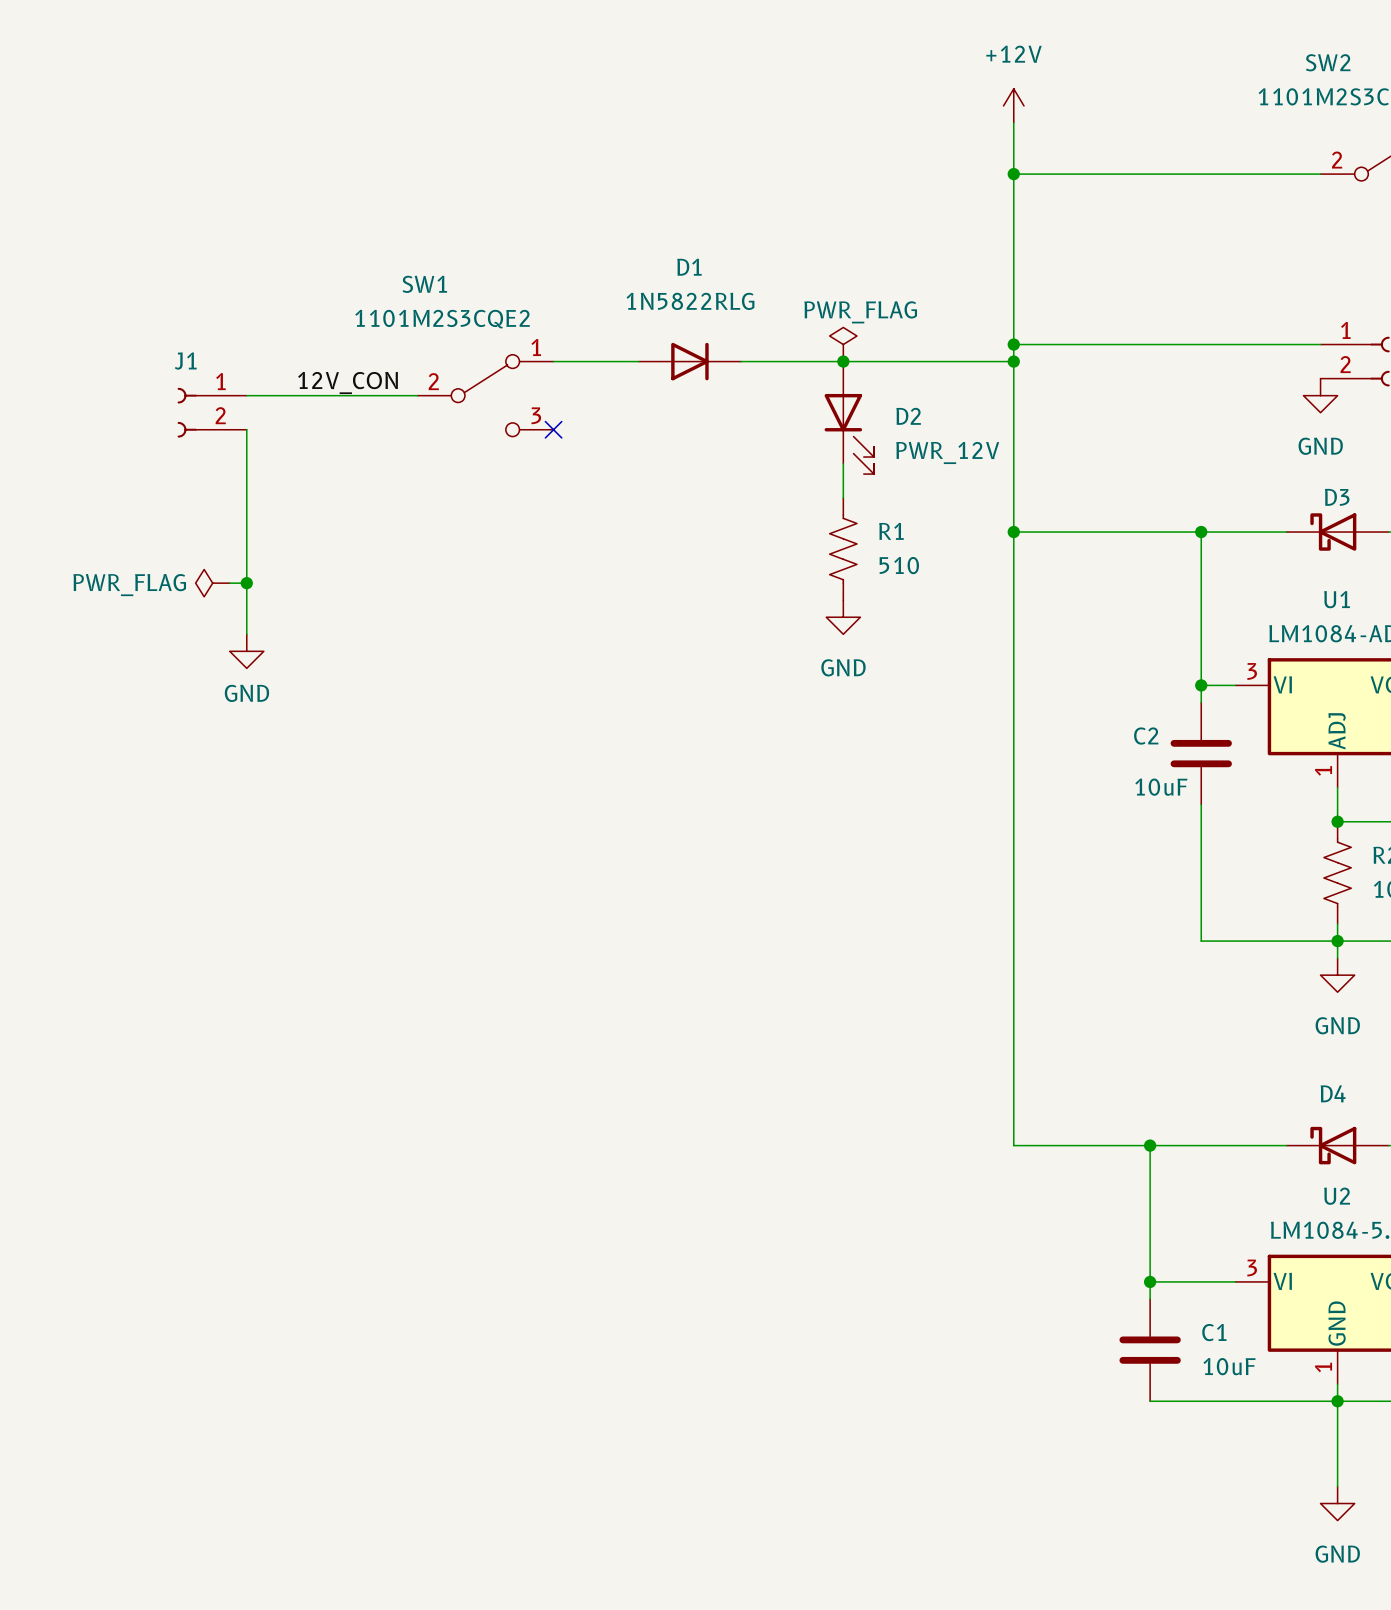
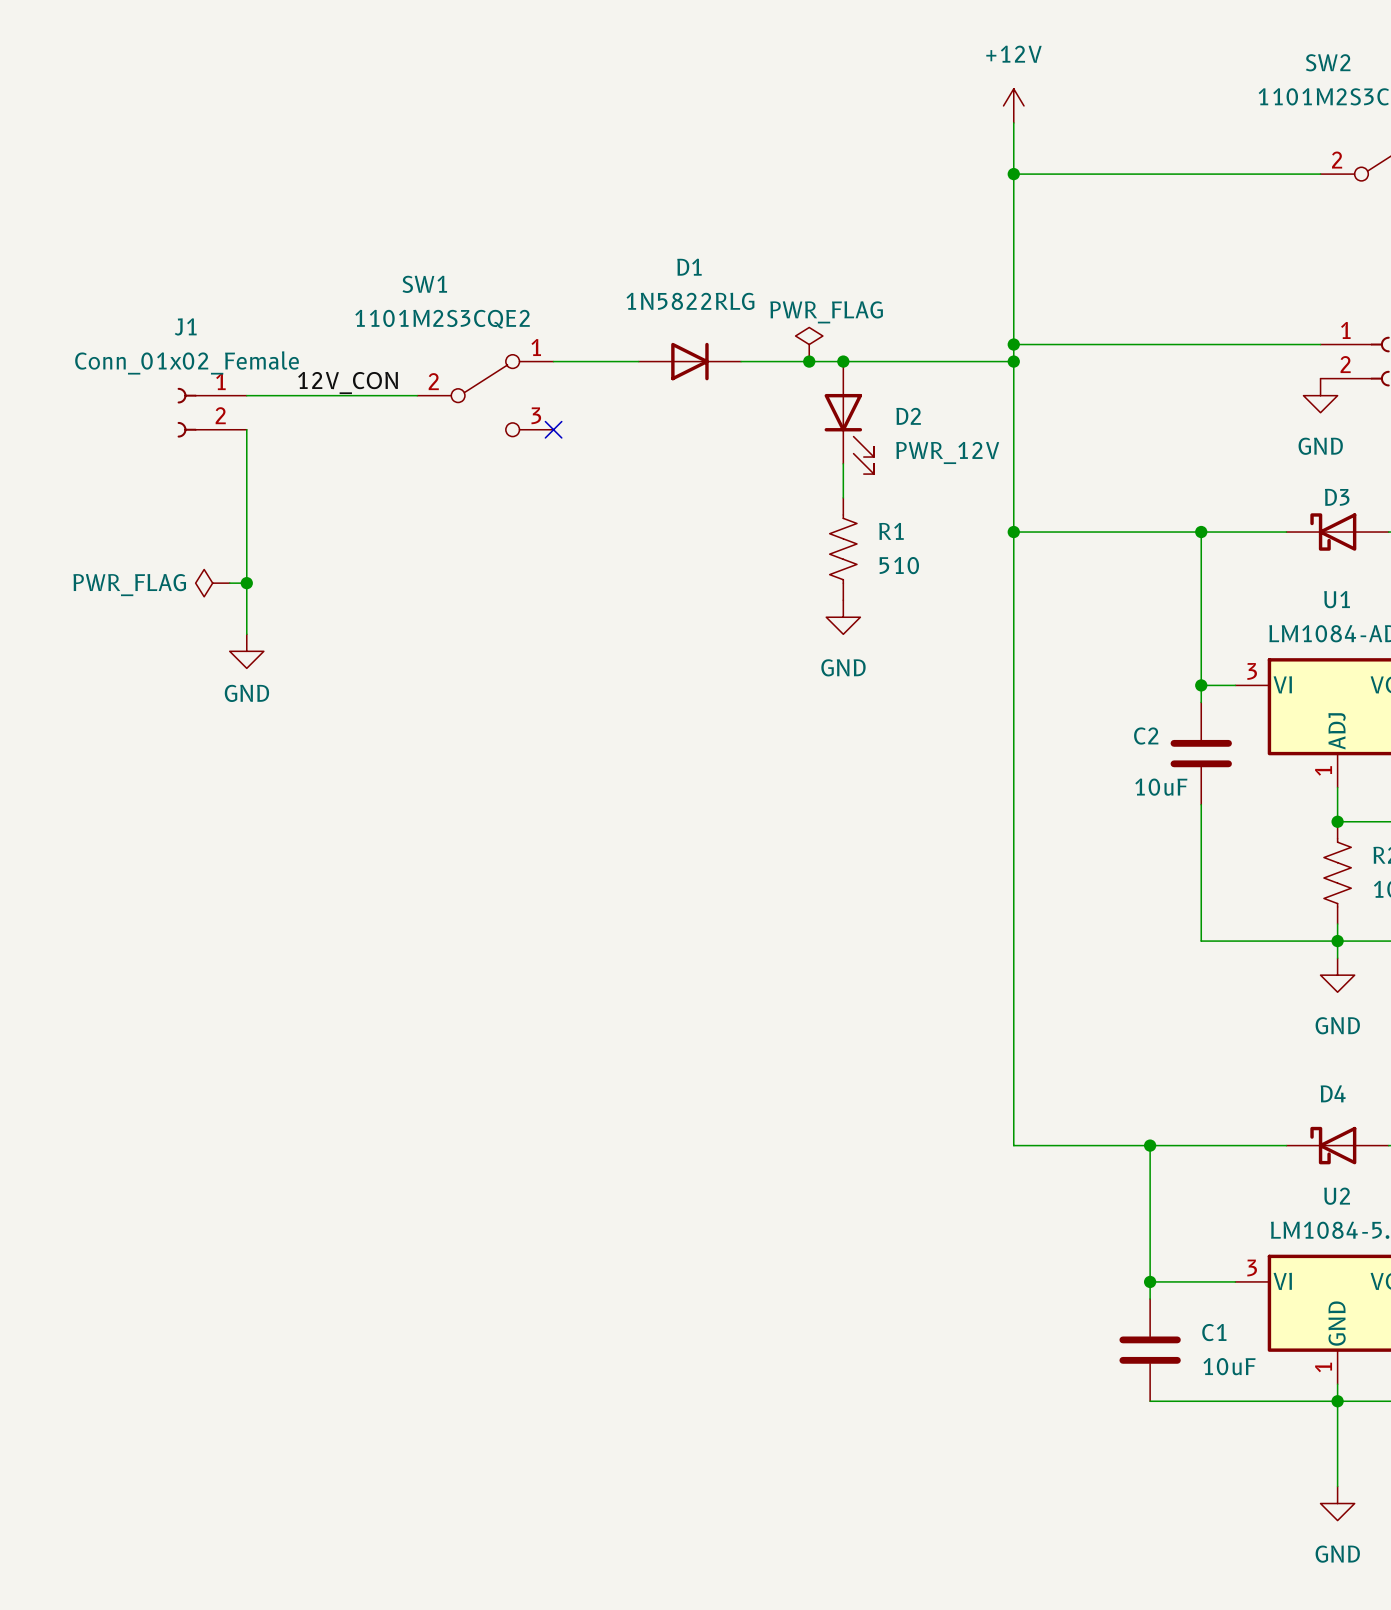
power symbol position: PWR_FLAG (843, 344) -> PWR_FLAG (809, 344)
J1 name position: J1 (185, 361) -> J1 (185, 326)
junction: none -> (809, 361)
J1 value: none -> Conn_01x02_Female (187, 362)

